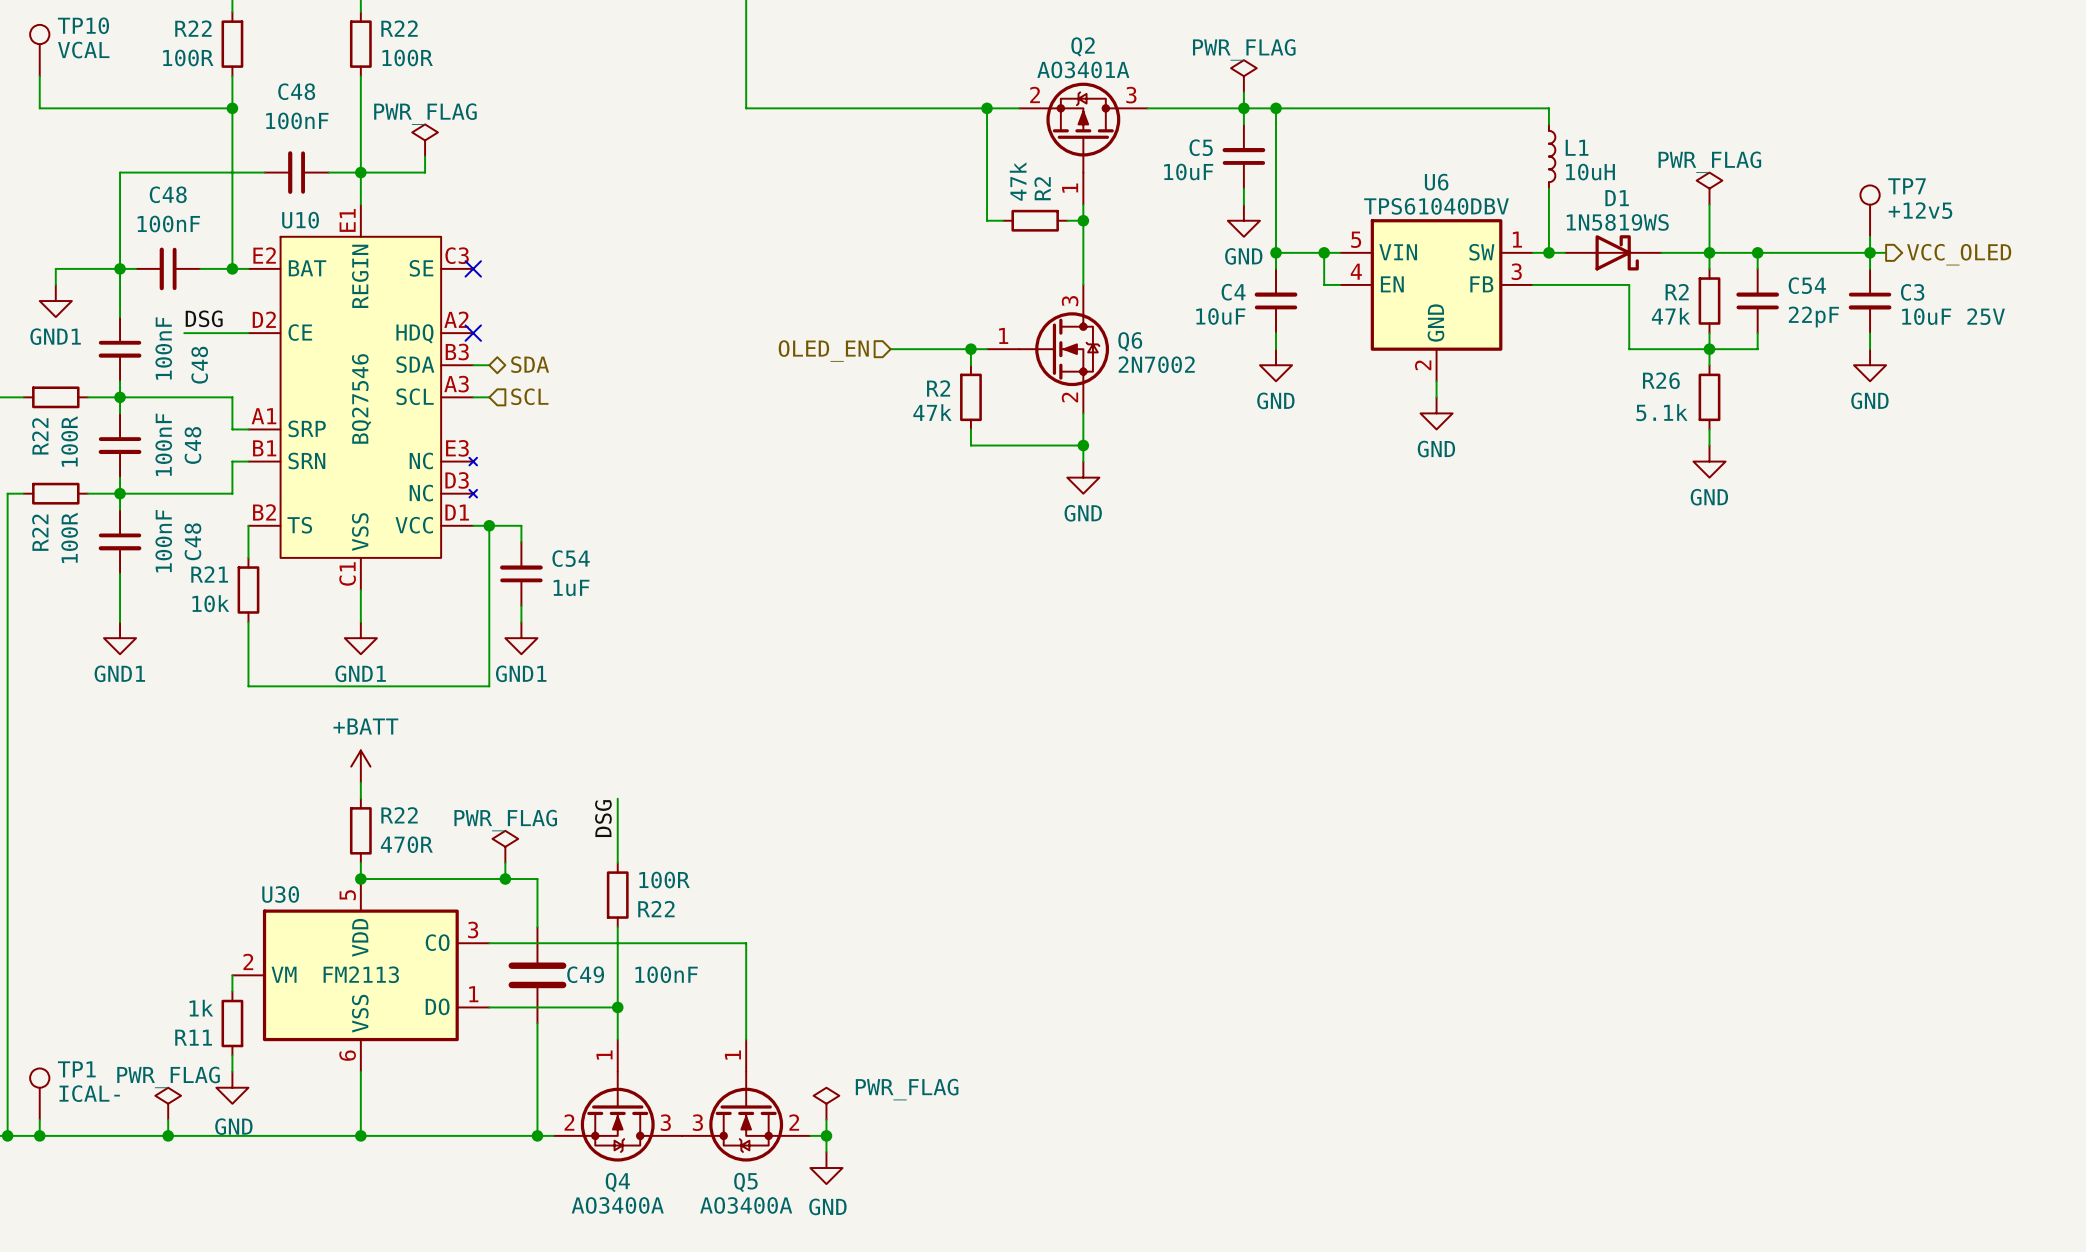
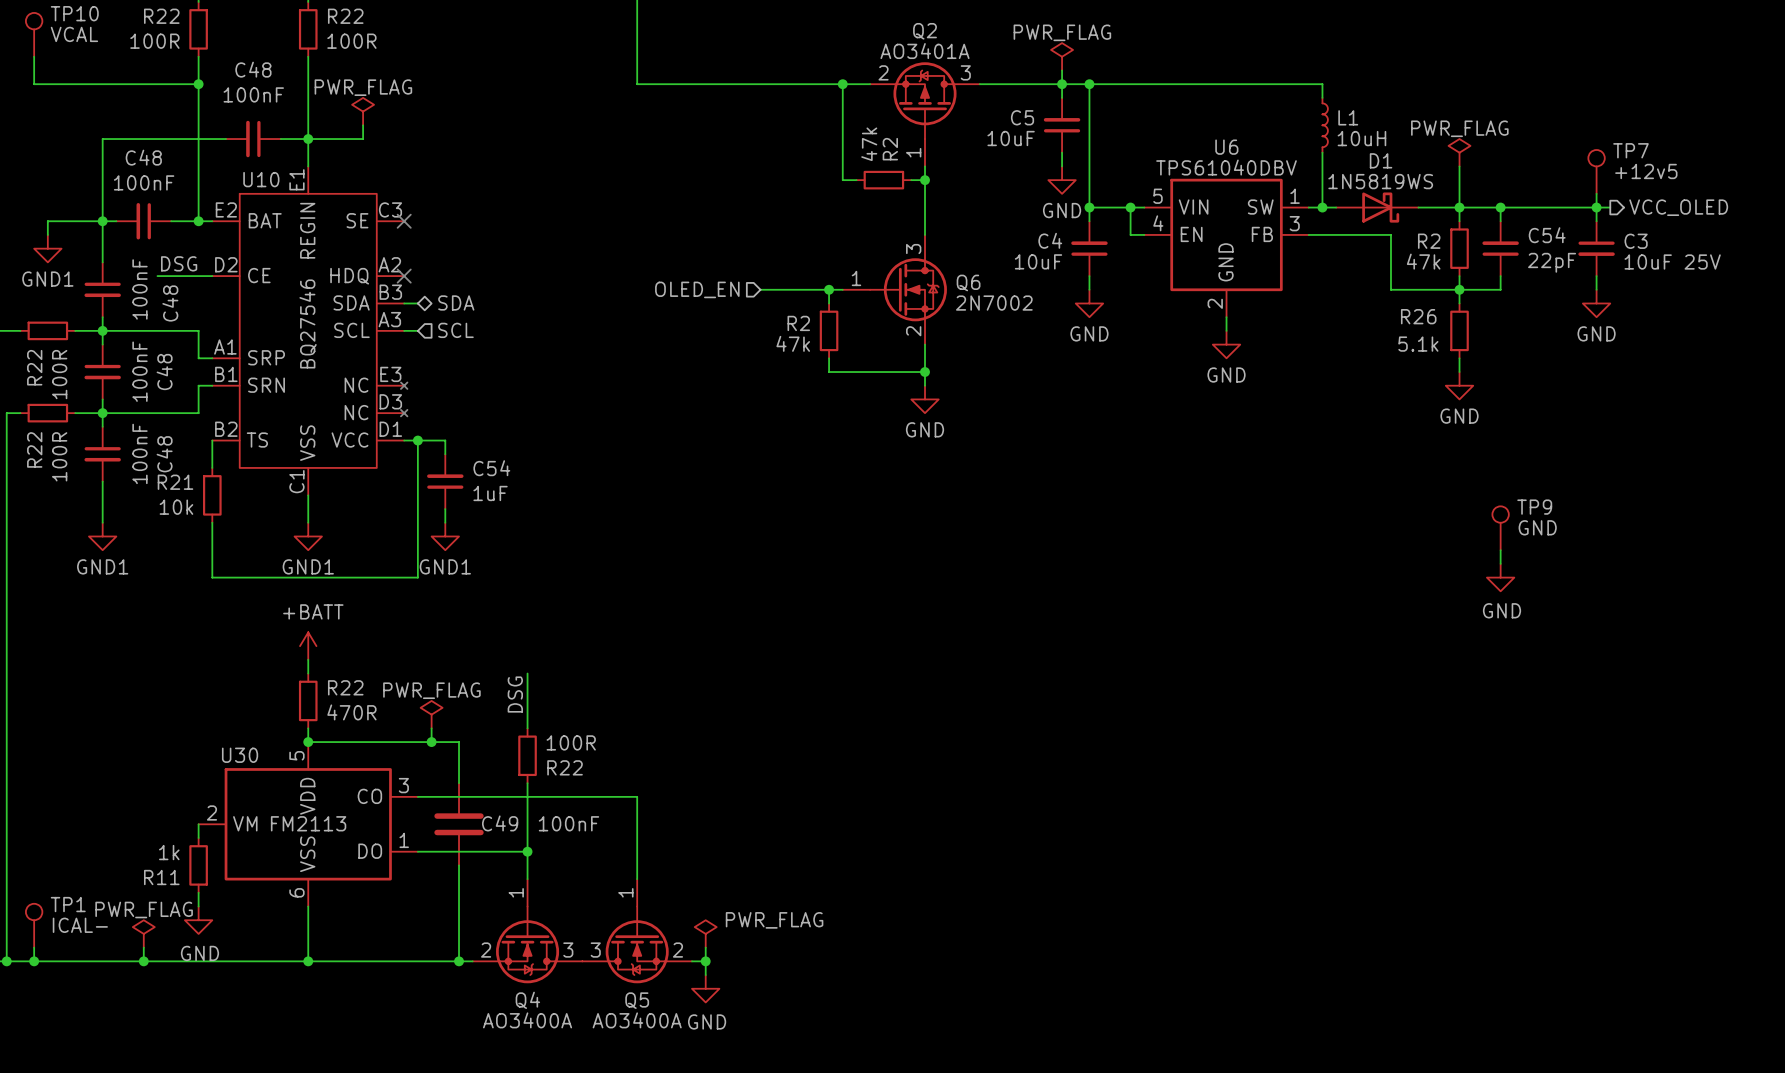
TP9: none -> GND (1500, 528)
wire: none -> (1500, 550) (1500, 563)
power symbol: none -> GND (1500, 577)

